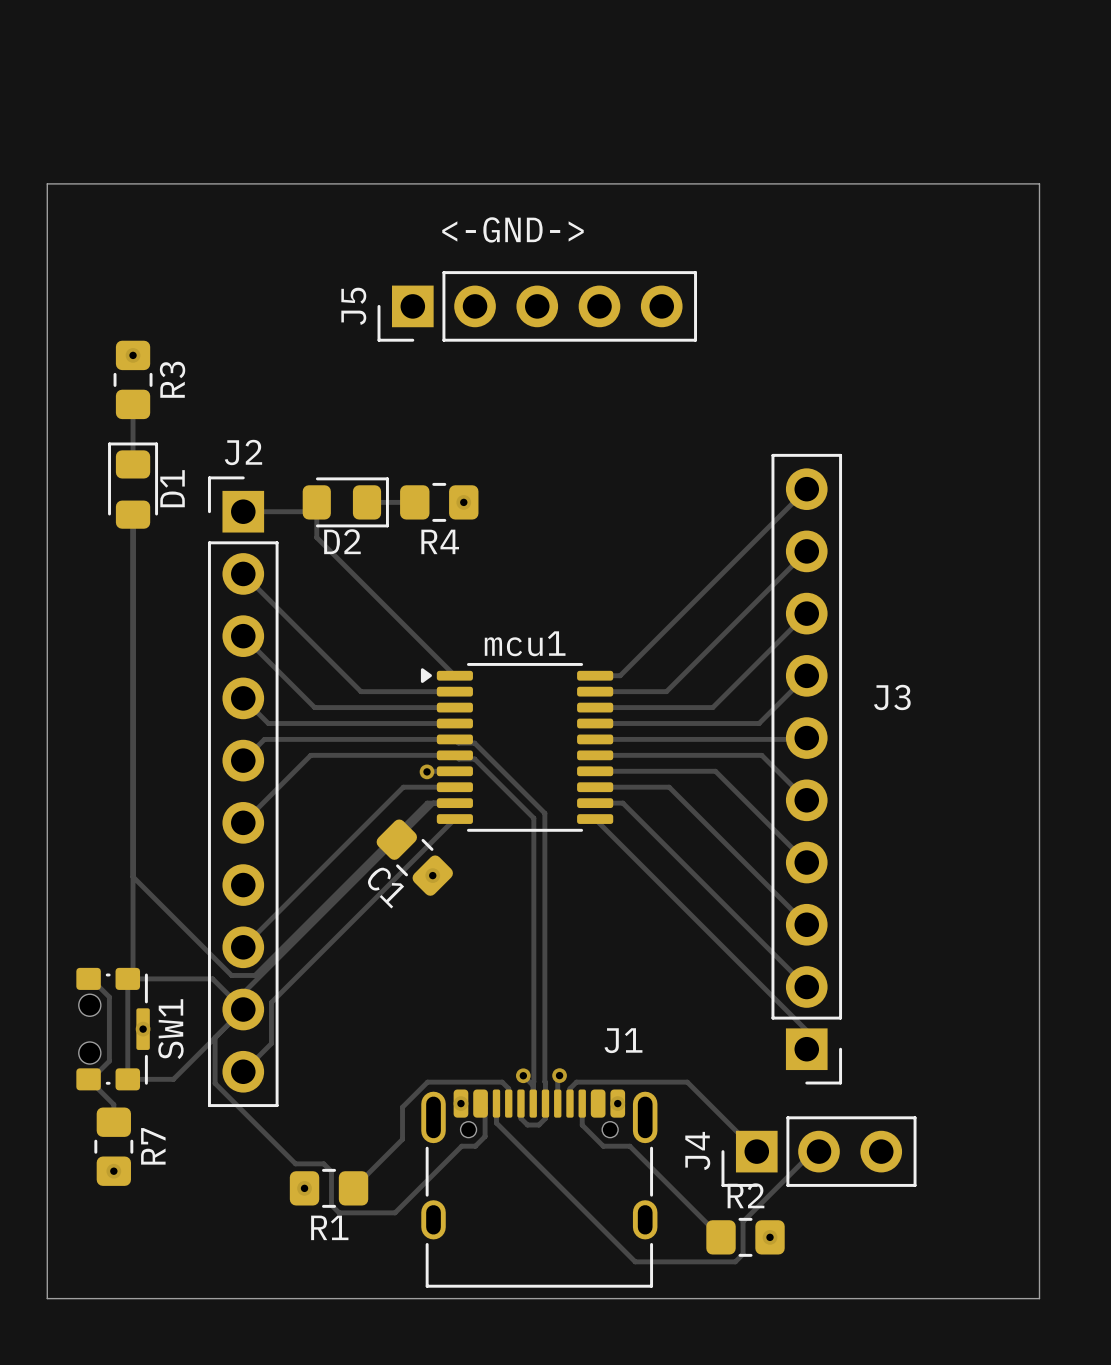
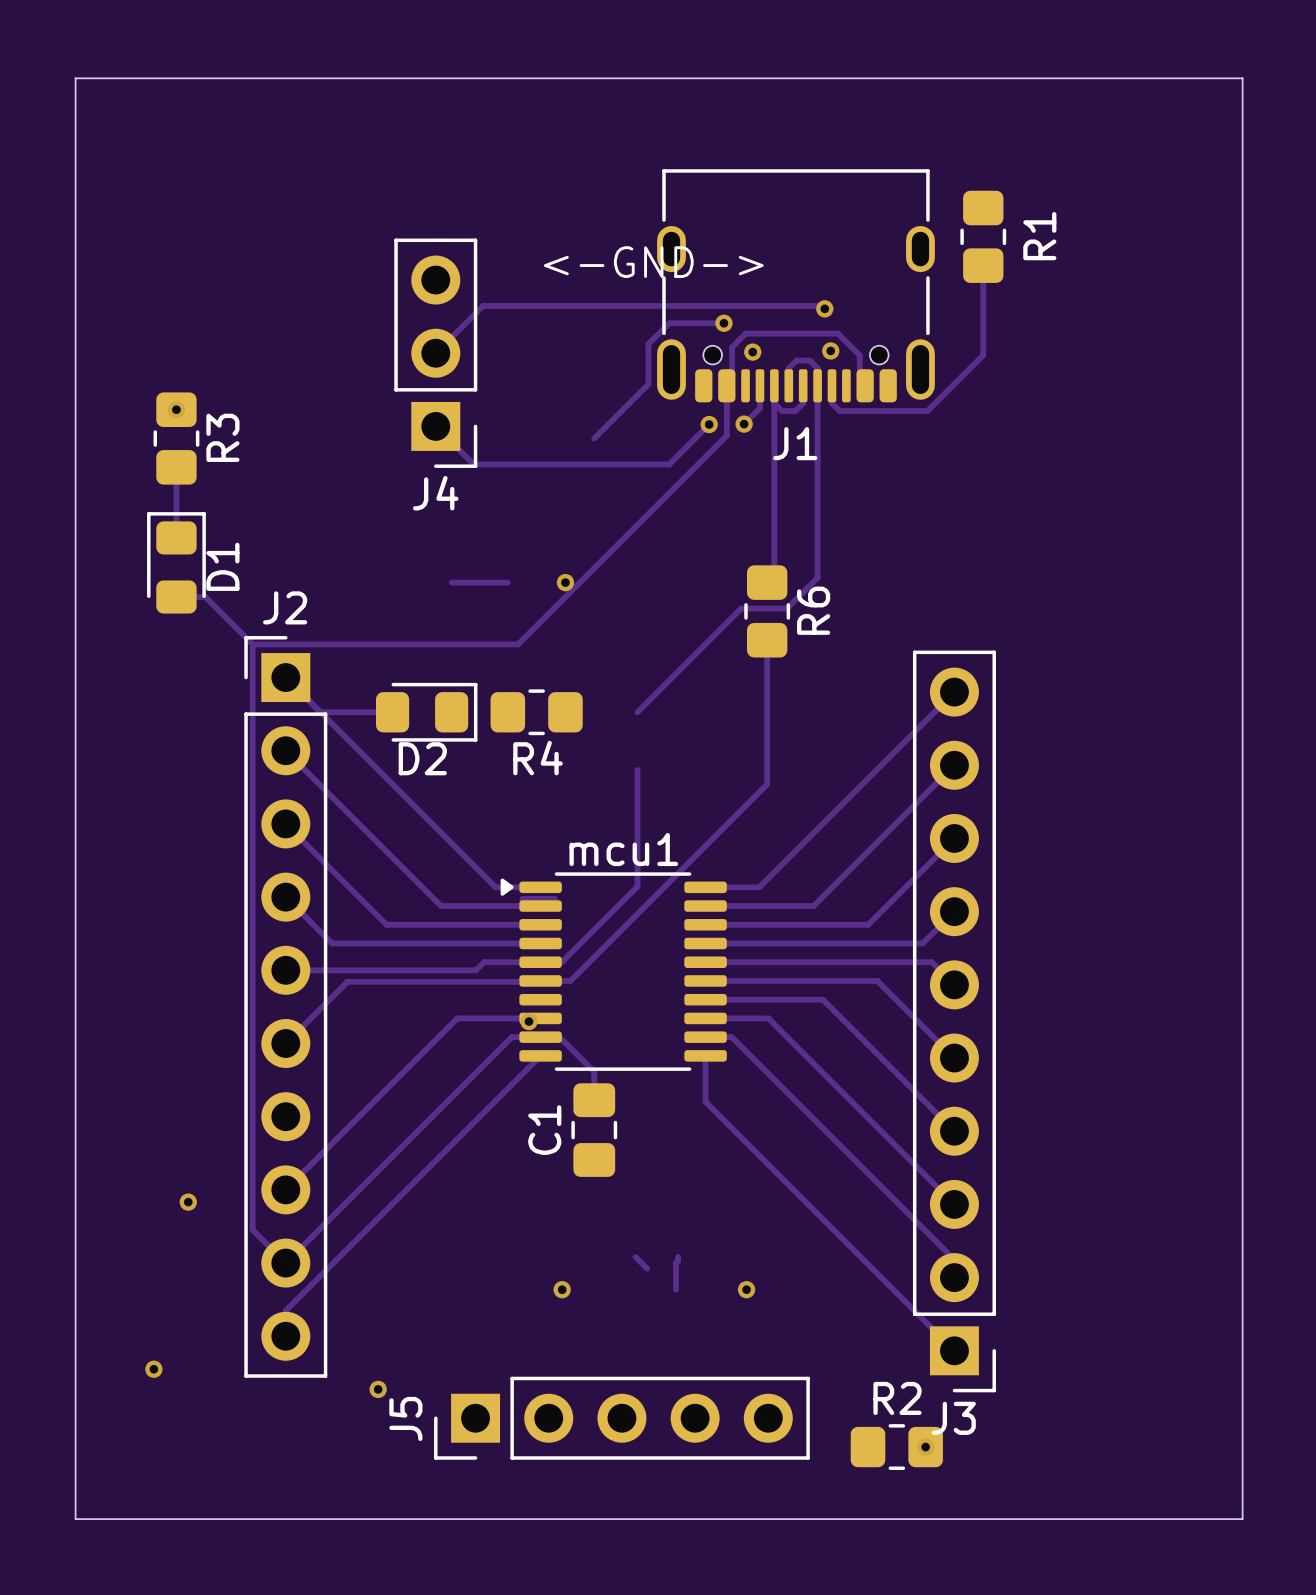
board edge: (47, 183) (1039, 183) -> (75, 208) (75, 78) (1242, 78) (1242, 208)
track: none -> (983, 265) (983, 355) (927, 411) (839, 411) (831, 403) (831, 385)
track: none -> (824, 308) (821, 305) (483, 305) (435, 353)
via: none -> (824, 308)
track: none -> (723, 323) (669, 323) (648, 344) (648, 384) (594, 438)
via: none -> (723, 323)
via: none -> (830, 350)
J5 position: (537, 306) -> (621, 1418)
via: none -> (752, 352)
track: none -> (759, 385) (759, 408) (744, 424)
track: none -> (774, 385) (774, 575) (767, 582)
track: none -> (788, 385) (788, 368) (796, 360) (809, 360) (817, 368) (817, 577) (786, 608) (741, 608) (637, 712)
track: none -> (803, 385) (803, 403) (795, 411) (782, 411) (774, 403)
track: none -> (865, 385) (859, 380) (859, 355) (837, 333) (745, 333) (732, 347) (732, 380) (726, 385) (726, 435) (518, 644) (252, 644)
track: none -> (709, 424) (669, 464) (473, 464) (435, 426)
via: none -> (709, 424)
via: none -> (744, 424)
track: (806, 489) (620, 675) (595, 675) -> none
track: (316, 502) (316, 537) (454, 675) -> none
D2 position: (345, 502) -> (426, 712)
R4 position: (439, 502) -> (536, 712)
track: (243, 511) (307, 511) -> none
track: (133, 514) (133, 973) (127, 978) -> (176, 597) (205, 597) (252, 644)
R6: none -> (767, 611)
track: none -> (767, 640) (767, 784) (570, 980) (347, 981) (285, 1043)
track: (806, 551) (666, 691) (595, 691) -> none
track: none -> (252, 644) (252, 1229) (285, 1263) (511, 1037) (559, 1037) (594, 1071) (594, 1100)
track: (243, 573) (361, 691) (454, 691) -> none
track: none -> (285, 677) (495, 887) (540, 887)
track: none -> (954, 692) (759, 887) (705, 887)
track: none -> (320, 712) (392, 712)
track: (806, 613) (712, 707) (595, 707) -> none
track: (243, 636) (314, 707) (454, 707) -> none
track: none -> (285, 750) (441, 906) (540, 906)
track: none -> (954, 765) (813, 906) (705, 906)
track: none -> (637, 769) (637, 886) (561, 962) (484, 962) (475, 970) (285, 970)
track: (806, 675) (759, 723) (595, 723) -> none
J3 name position: J3 (892, 697) -> J3 (953, 1418)
track: (243, 698) (268, 723) (454, 723) -> none
track: none -> (285, 823) (386, 924) (540, 924)
track: none -> (954, 838) (868, 924) (705, 924)
track: (595, 739) (805, 739) -> none
mcu1 position: (517, 747) -> (613, 971)
track: (454, 755) (310, 755) (243, 822) -> none
track: (455, 755) (458, 759) (474, 759) (533, 818) (533, 1103) -> none
track: (595, 755) (761, 755) (806, 800) -> none
track: (243, 760) (264, 739) (454, 739) (458, 743) (474, 743) (544, 813) (545, 1118) (538, 1125) (527, 1125) (520, 1118) (520, 1103) -> none
track: none -> (285, 897) (332, 943) (540, 943)
J3 position: (806, 769) -> (954, 1021)
via: (427, 771) -> none
track: (595, 771) (715, 771) (806, 862) -> none
track: none -> (954, 911) (922, 943) (705, 943)
track: (454, 787) (403, 787) (243, 947) -> none
track: (595, 787) (669, 787) (806, 924) -> none
J2 position: (243, 791) -> (285, 1006)
track: (433, 803) (243, 993) (243, 1009) -> none
track: (454, 803) (427, 803) (254, 975) (231, 975) (133, 876) -> none
track: (595, 803) (622, 803) (806, 986) -> none
track: (454, 819) (271, 1002) (271, 1043) (243, 1071) -> none
track: (595, 819) (806, 1030) (806, 1049) -> none
track: none -> (705, 962) (931, 962) (954, 984)
track: none -> (705, 980) (877, 980) (954, 1058)
C1 rotation: 0° (414, 857) -> 45° clockwise (594, 1130)
C1 position: (414, 857) -> (594, 1130)
track: none -> (705, 999) (822, 999) (954, 1131)
track: none -> (540, 1018) (457, 1018) (285, 1189)
track: none -> (705, 1018) (768, 1018) (954, 1204)
track: none -> (705, 1037) (731, 1037) (954, 1259) (954, 1277)
track: none -> (540, 1055) (285, 1310) (285, 1336)
track: none -> (705, 1055) (705, 1101) (954, 1350)
track: (88, 978) (91, 978) (109, 997) (109, 1061) (91, 1079) (88, 1079) (113, 1104) (113, 1122) -> none
track: (127, 978) (127, 1079) (173, 1079) (243, 1009) -> none
track: (127, 978) (212, 978) (243, 1009) -> none
SW1: (113, 1029) -> none
track: (215, 1037) (215, 1083) (295, 1163) (323, 1163) (331, 1171) (331, 1205) (339, 1212) (395, 1212) (461, 1146) (475, 1146) (485, 1136) (485, 1108) (480, 1103) -> none
J1 name position: J1 (623, 1040) -> J1 (795, 443)
via: (523, 1075) -> none
via: (559, 1075) -> none
track: (496, 1103) (496, 1123) (635, 1261) (735, 1261) (743, 1254) (743, 1221) (813, 1151) -> none
track: (508, 1103) (508, 1088) (502, 1082) (427, 1082) (402, 1107) (402, 1139) (353, 1188) -> none
track: (569, 1103) (569, 1088) (576, 1082) (687, 1082) (756, 1151) -> none
track: (582, 1103) (582, 1125) (603, 1146) (629, 1146) (721, 1237) -> none
R7: (113, 1146) -> none
J4 rotation: 0° (819, 1151) -> 90° counterclockwise (435, 353)
J4 position: (819, 1151) -> (435, 353)
R1 rotation: 0° (329, 1188) -> 90° clockwise (983, 236)
R1 position: (329, 1188) -> (983, 236)
J1 rotation: 0° (539, 1188) -> 180° (795, 285)
J1 position: (539, 1188) -> (795, 285)
R1 name position: R1 (329, 1227) -> R1 (1039, 236)

